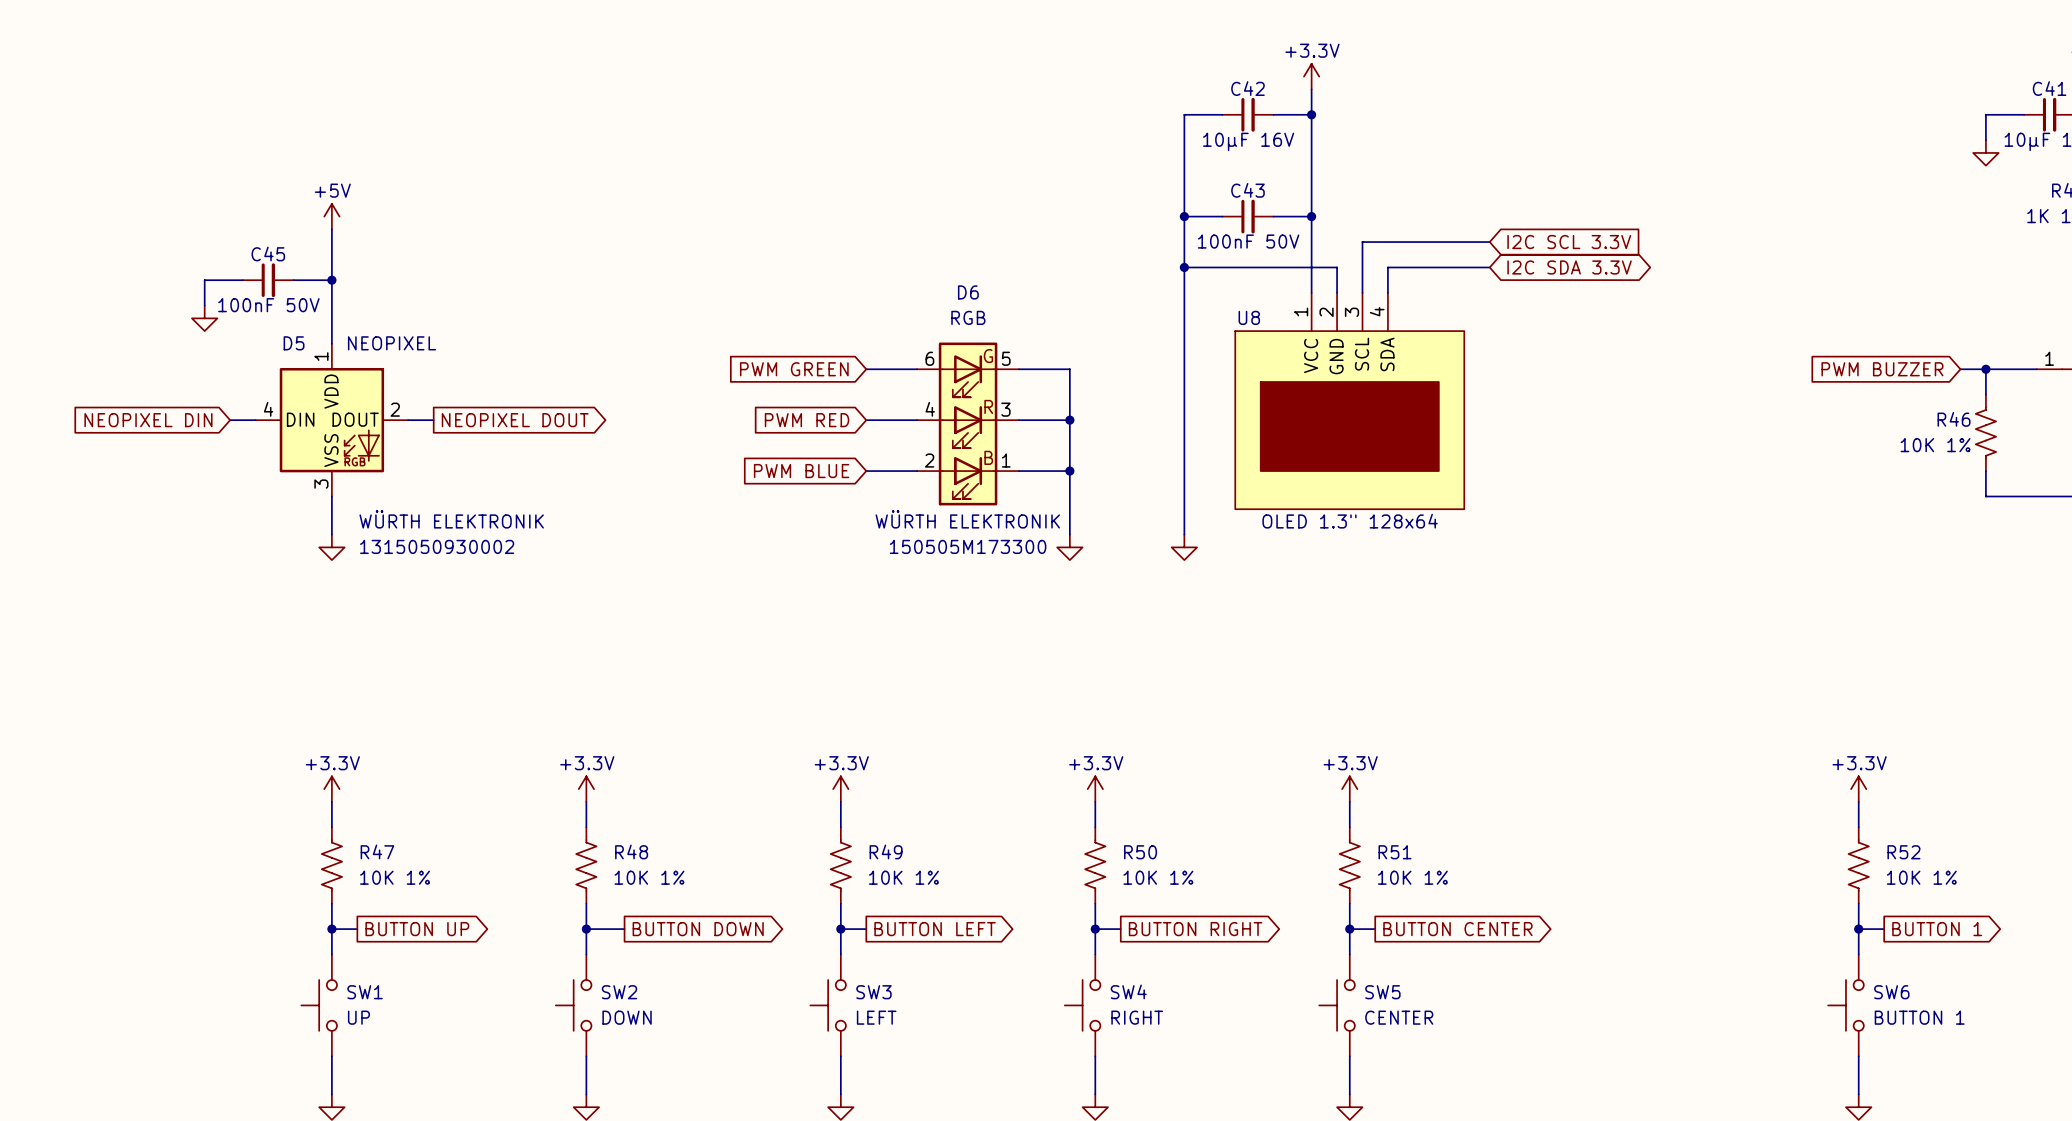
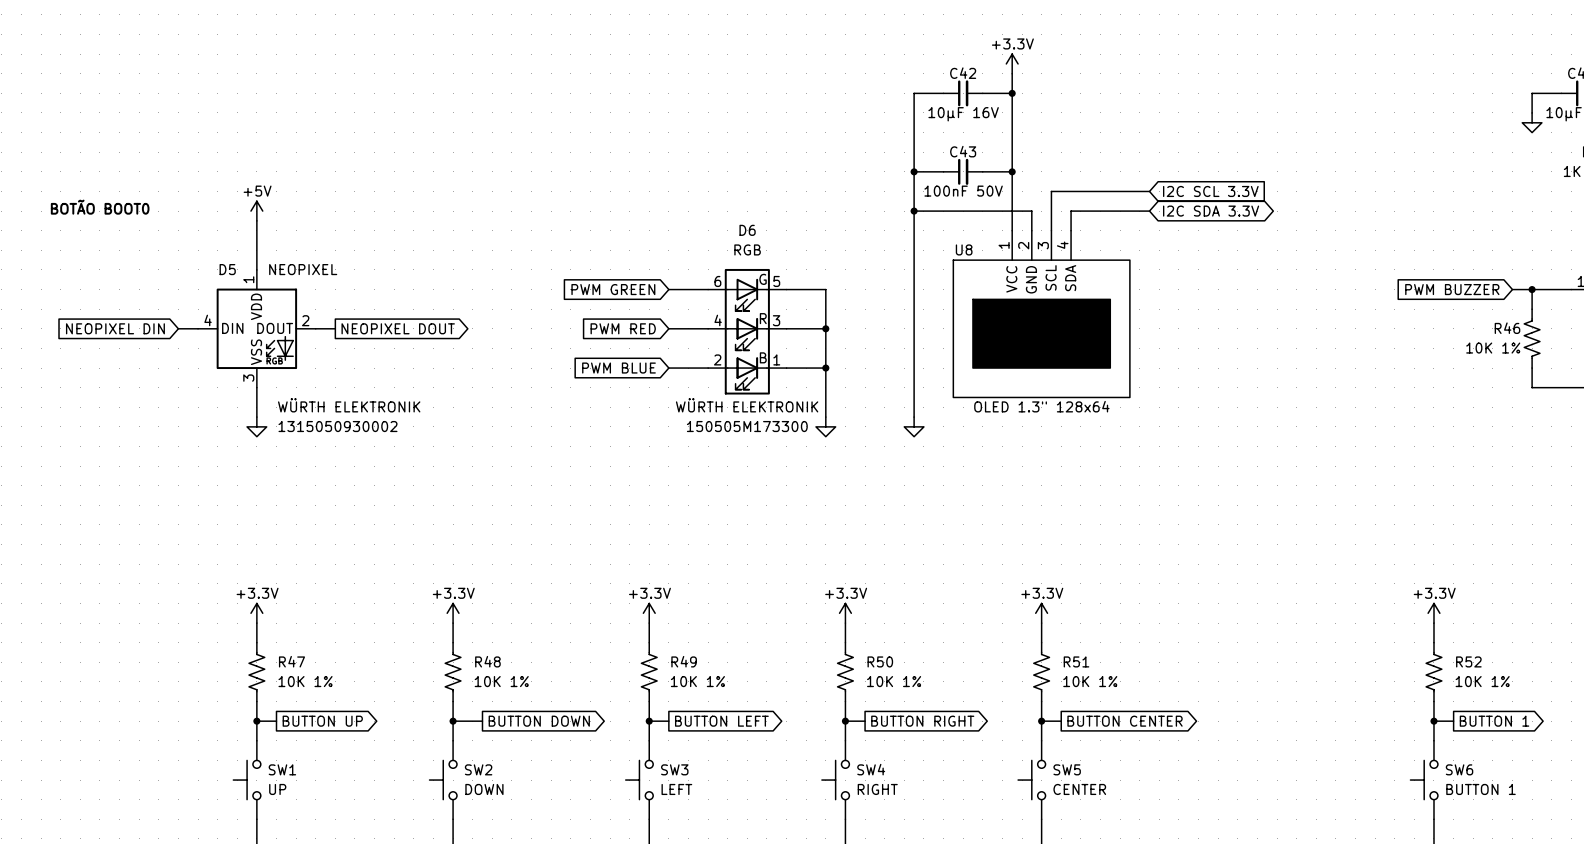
power symbol position: +5V (331, 216) -> +5V (256, 211)
wire: (331, 229) (331, 280) (293, 280) -> none
text: none -> BOTÃO BOOT0 (100, 207)
wire: (242, 280) (204, 280) (204, 305) -> none
C45: 100nF 50V (268, 280) -> none
junction: (331, 280) -> none
power symbol: (204, 318) -> none

